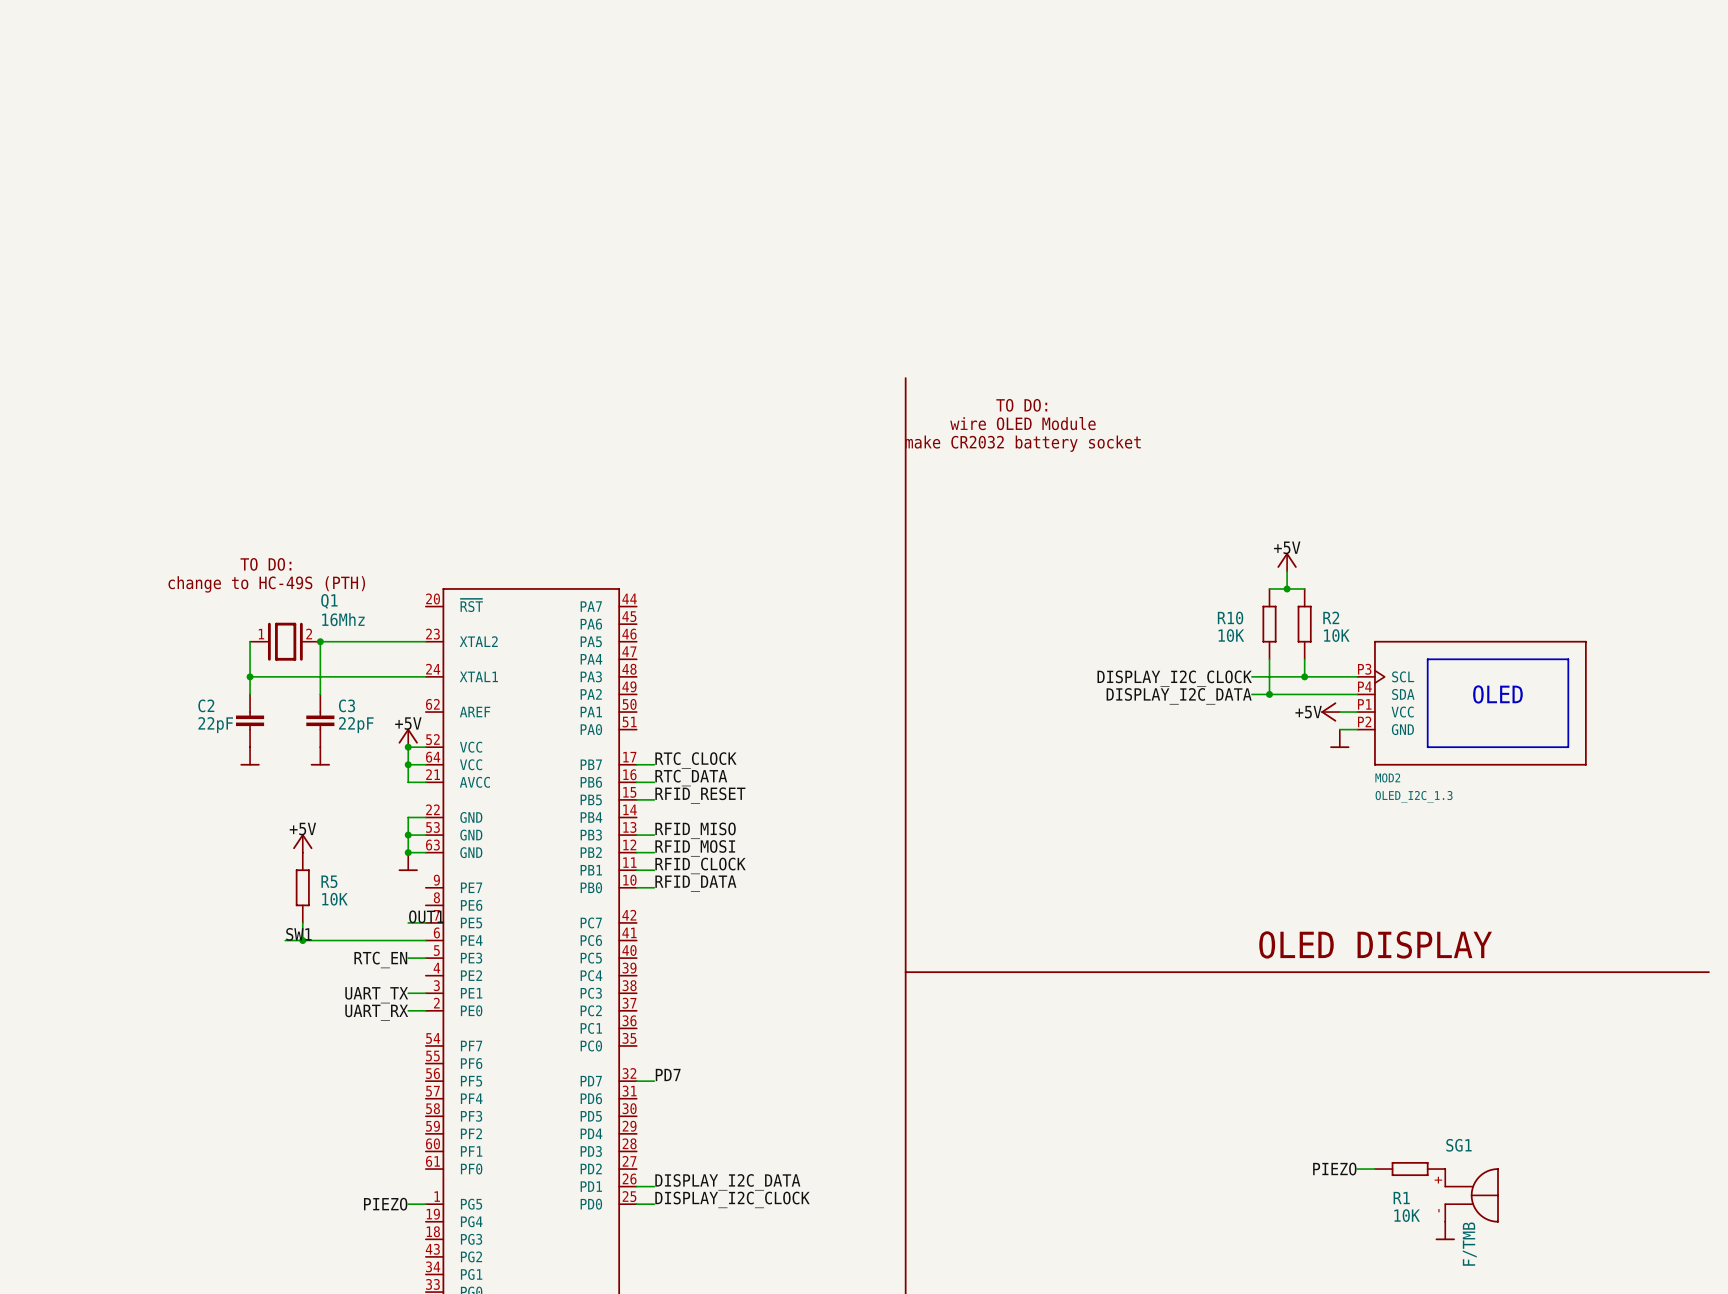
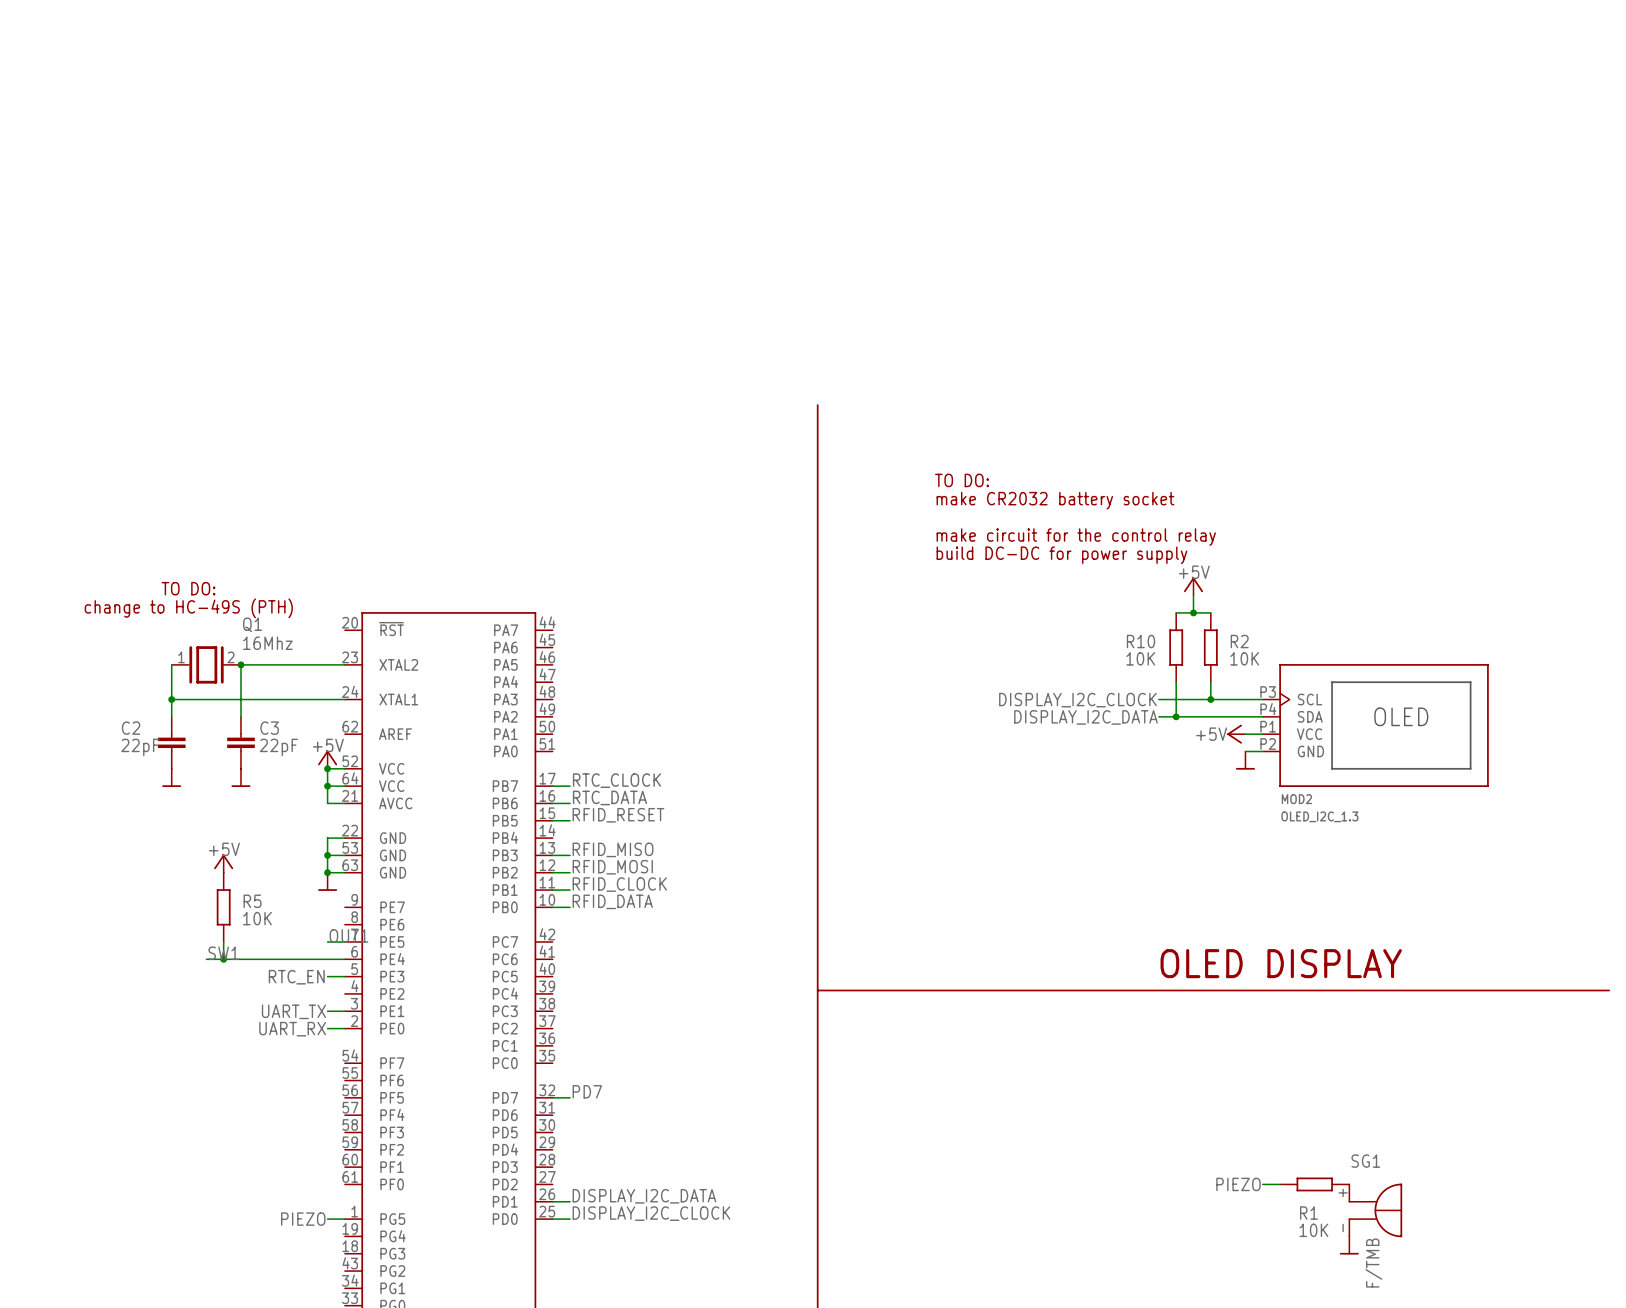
text: TO DO: (1021, 405) -> none
text: wire OLED Module (1022, 423) -> none
text: make CR2032 battery socket (1023, 443) -> TO DO: (961, 480)
text: none -> make CR2032 battery socket (1055, 500)
text: none -> make circuit for the control relay (1076, 537)
text: none -> build DC-DC for power supply (1061, 555)

